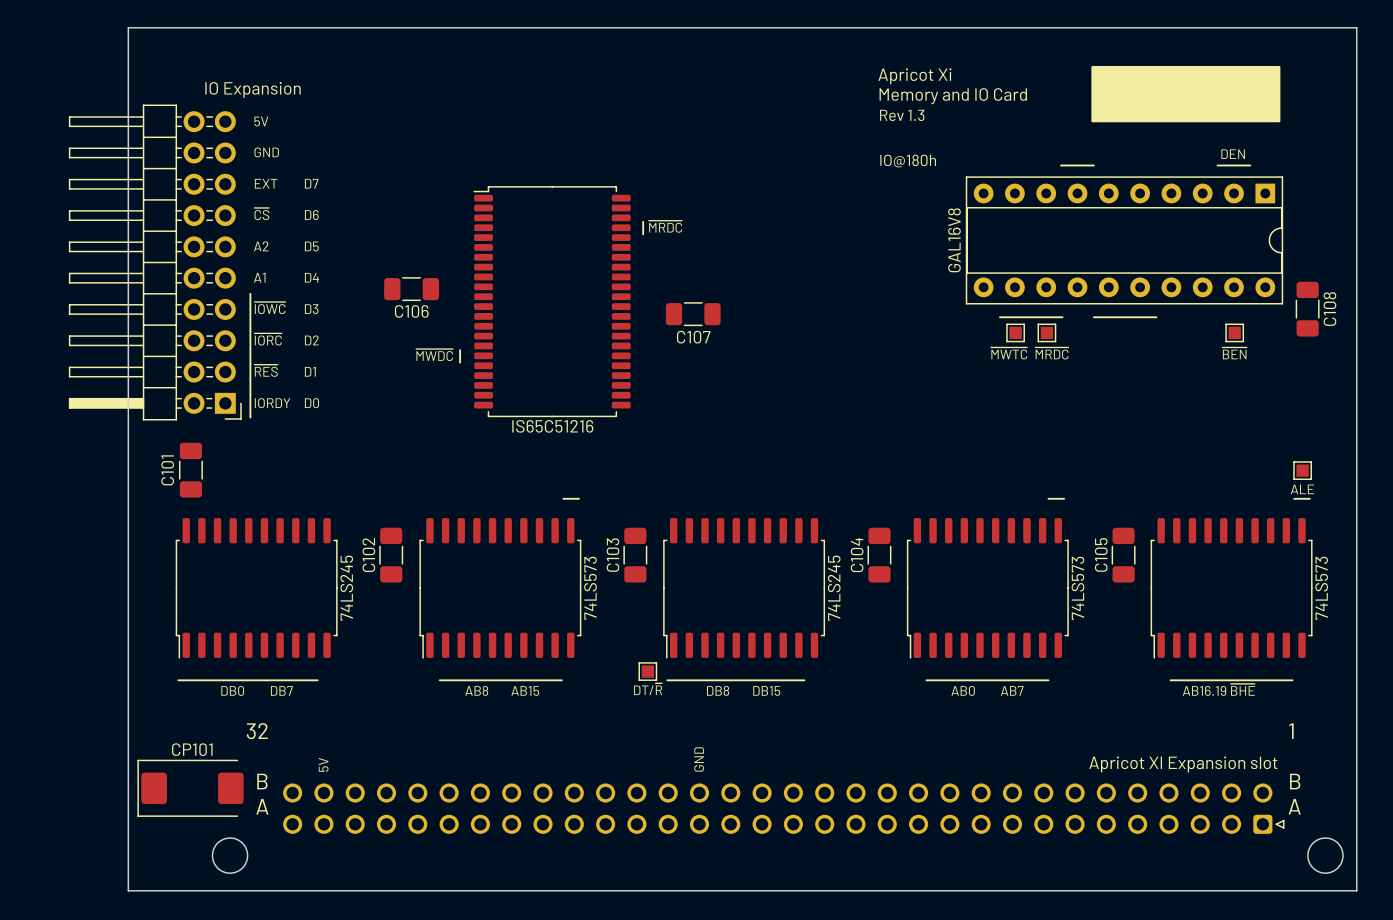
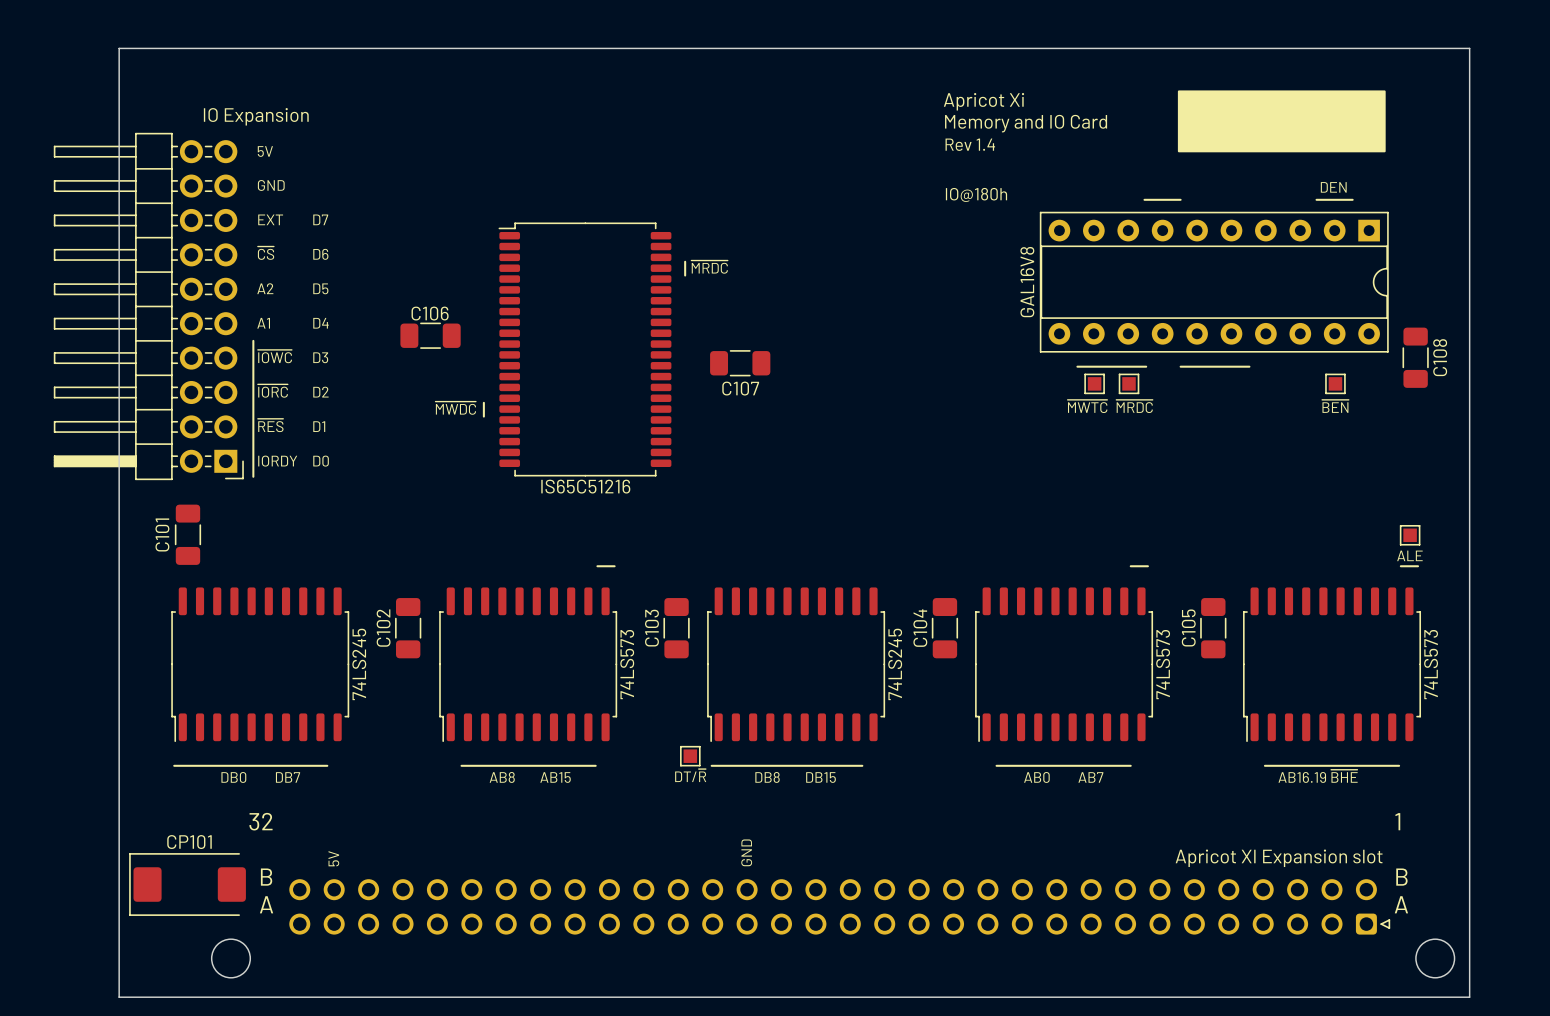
text: Rev 1.3 (902, 115) -> Rev 1.4 (970, 144)
C106 name position: C106 (411, 311) -> C106 (430, 313)

